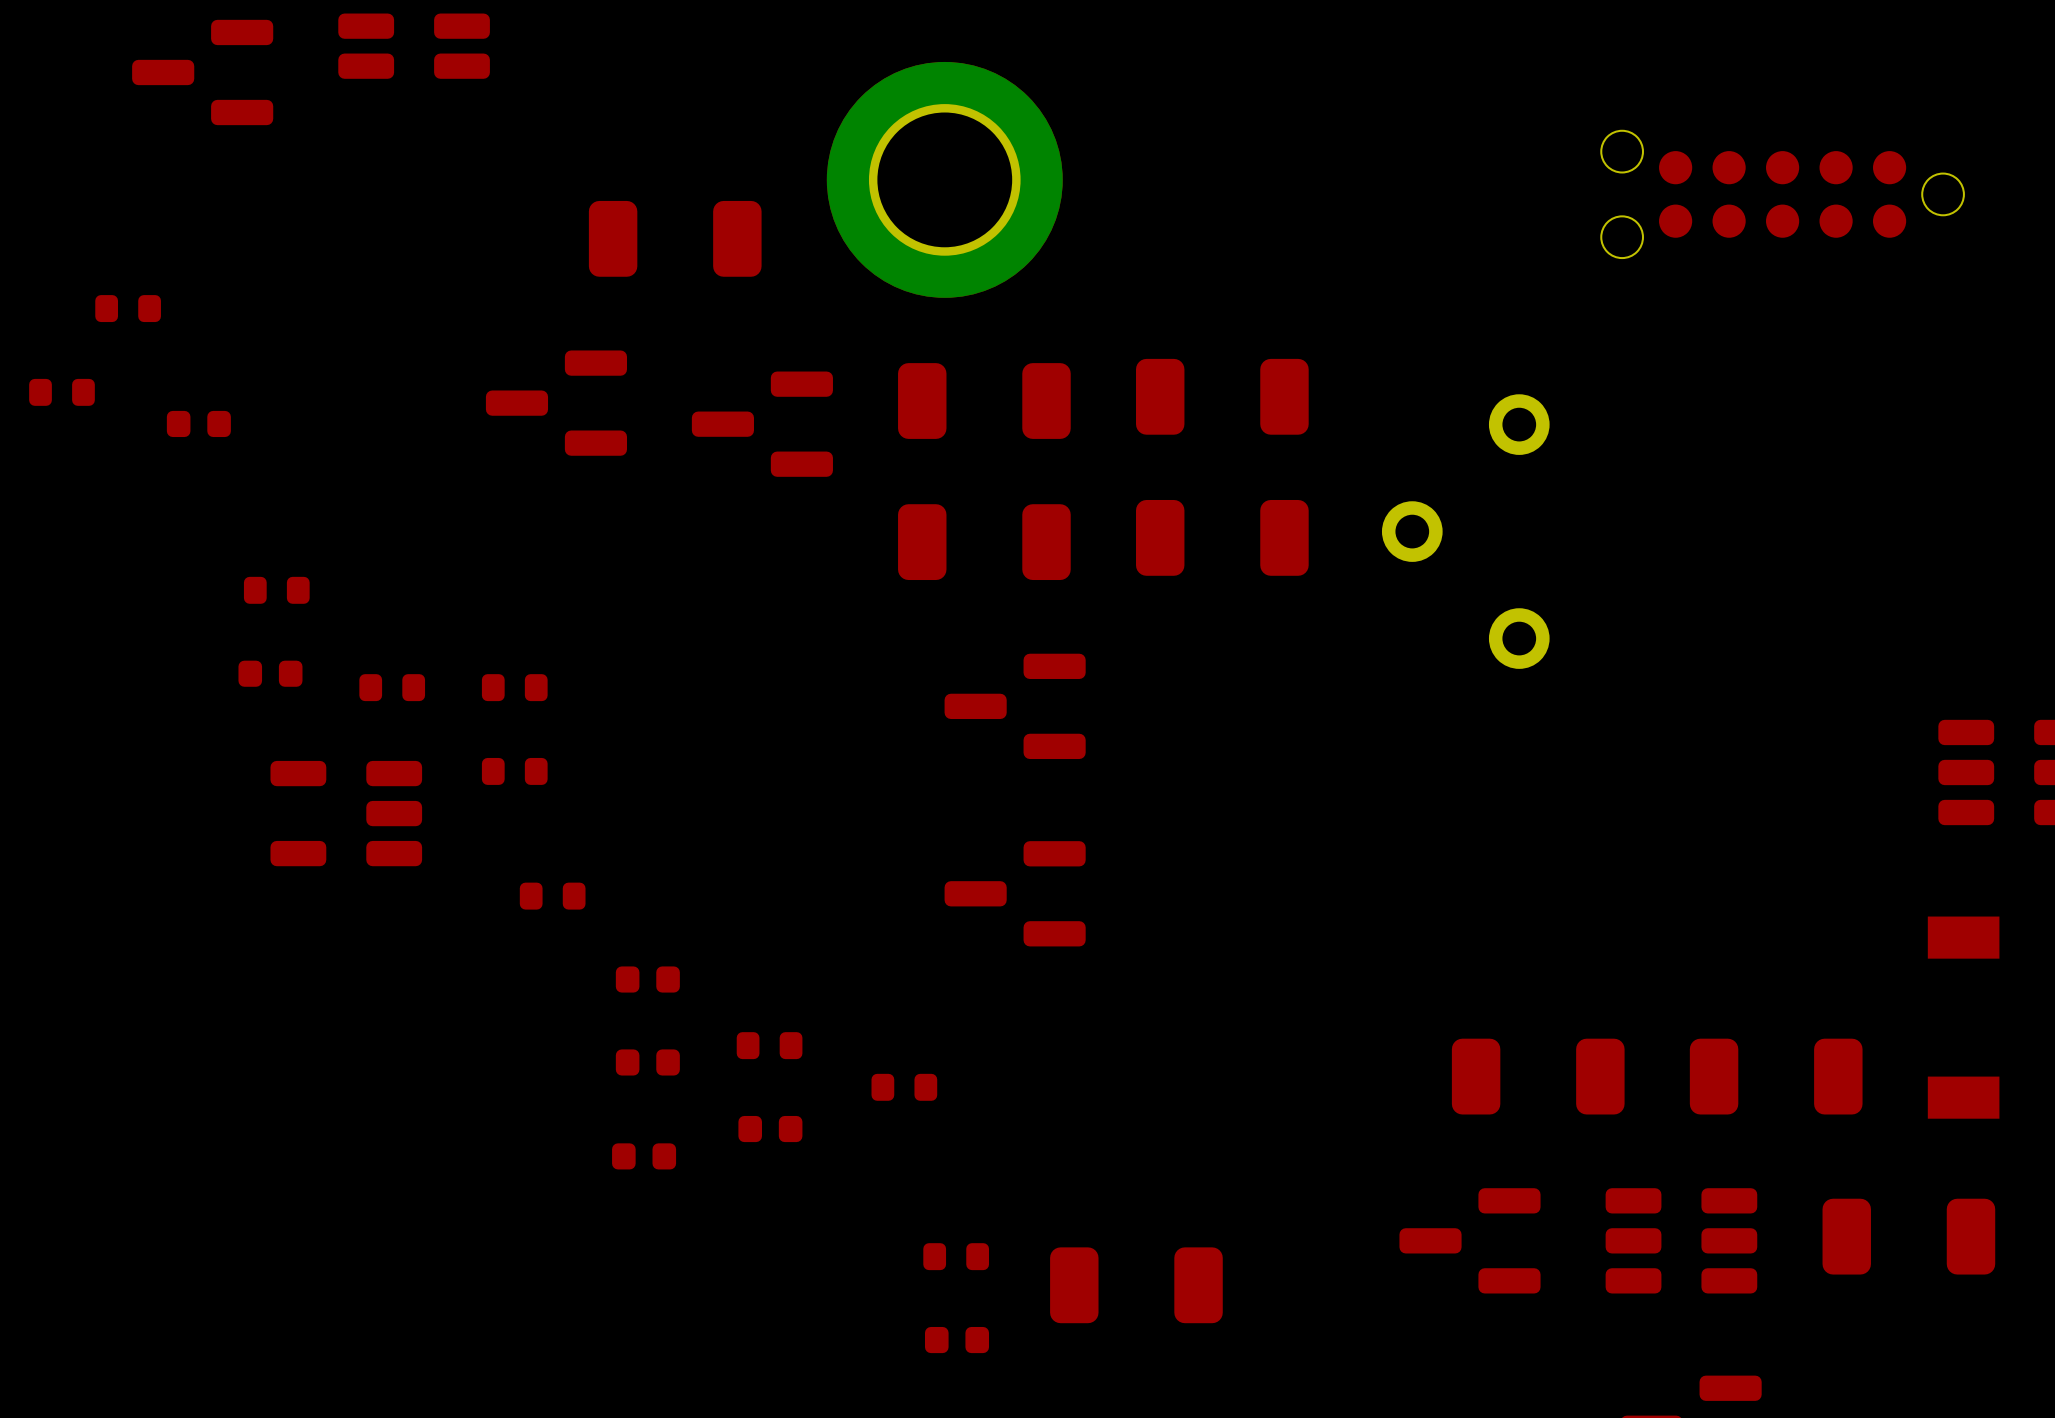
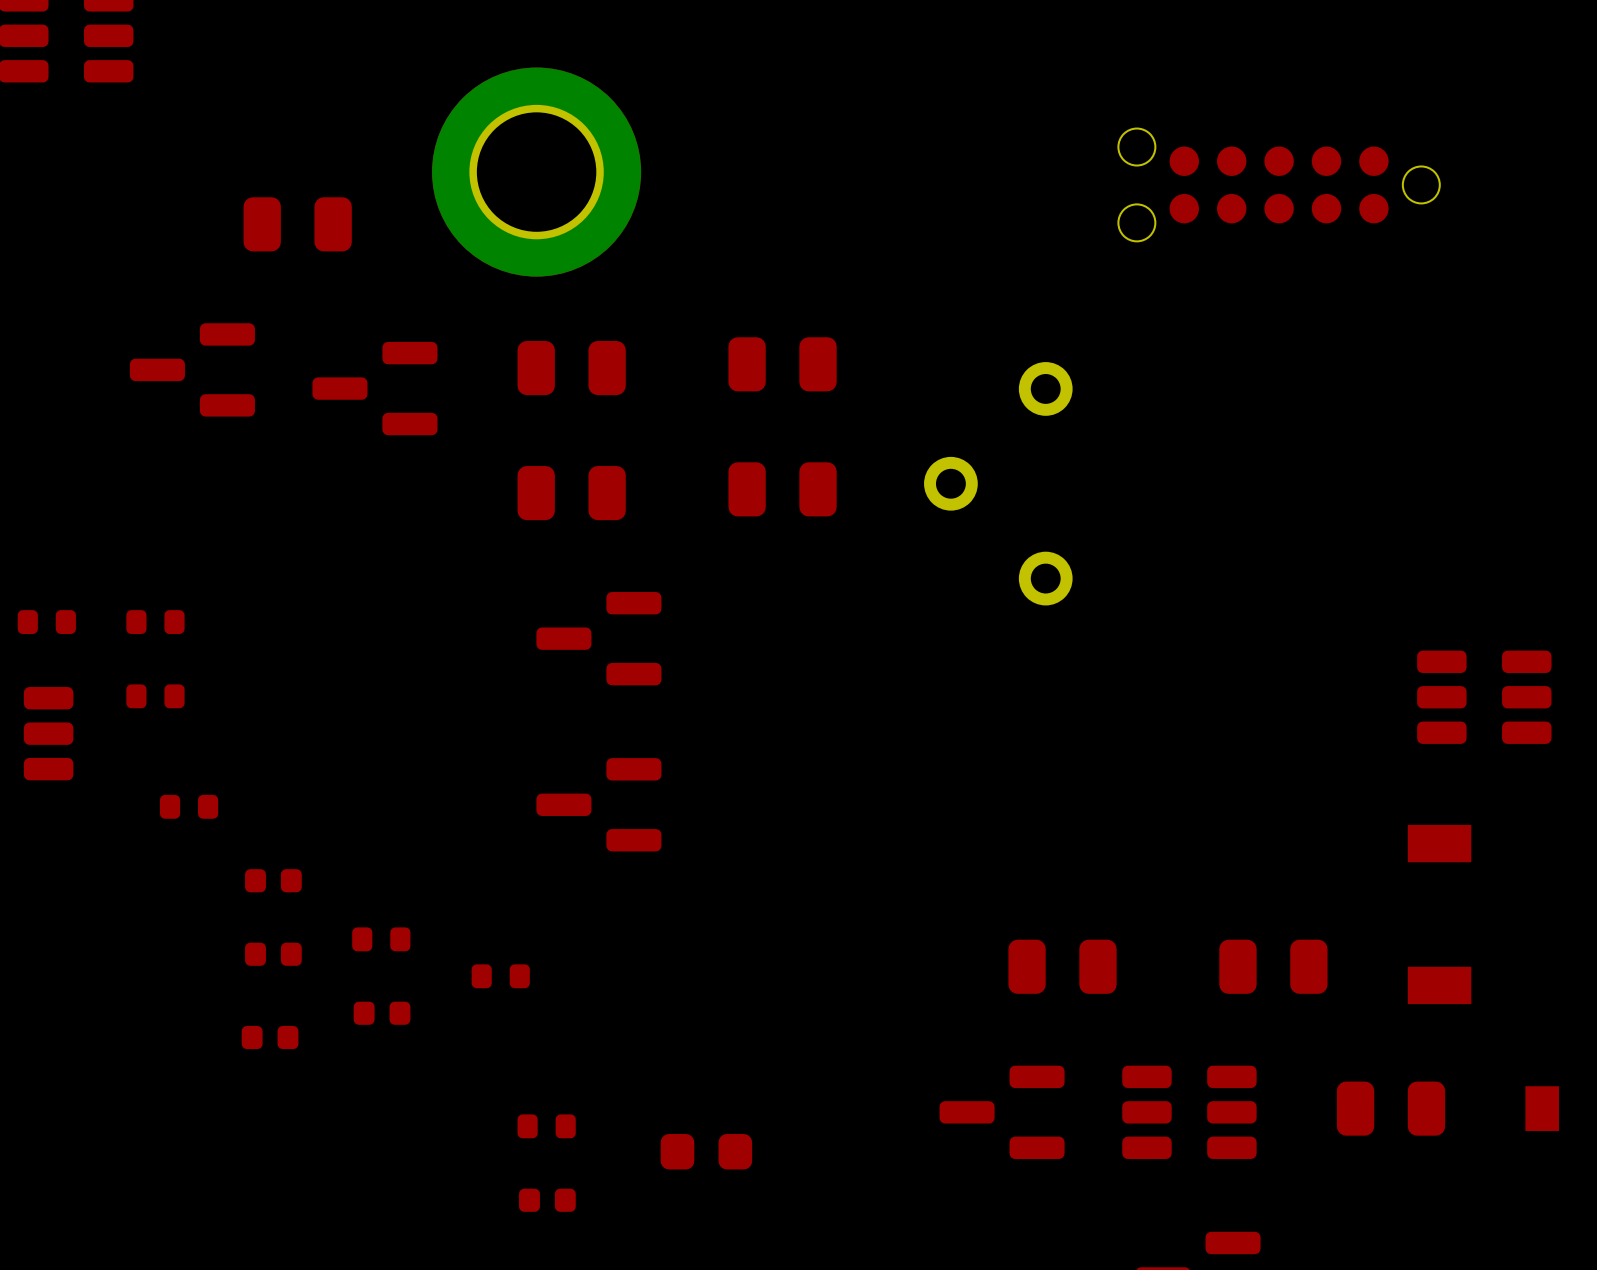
part footprint: [588, 200, 762, 277] -> [243, 197, 352, 252]
part footprint: [1136, 358, 1309, 435] -> [728, 337, 837, 392]
part footprint: [898, 363, 1071, 439] -> [517, 340, 626, 396]
part footprint: [1136, 499, 1309, 576] -> [728, 462, 837, 517]
part footprint: [898, 504, 1071, 581] -> [517, 466, 626, 521]
part footprint: [1451, 1038, 1625, 1115] -> [1008, 939, 1117, 994]
part footprint: [1689, 1038, 1863, 1115] -> [1219, 939, 1328, 994]
part footprint: [1822, 1198, 1996, 1275] -> [1336, 1081, 1446, 1136]
part footprint: [1050, 1247, 1223, 1324] -> [660, 1134, 753, 1170]

